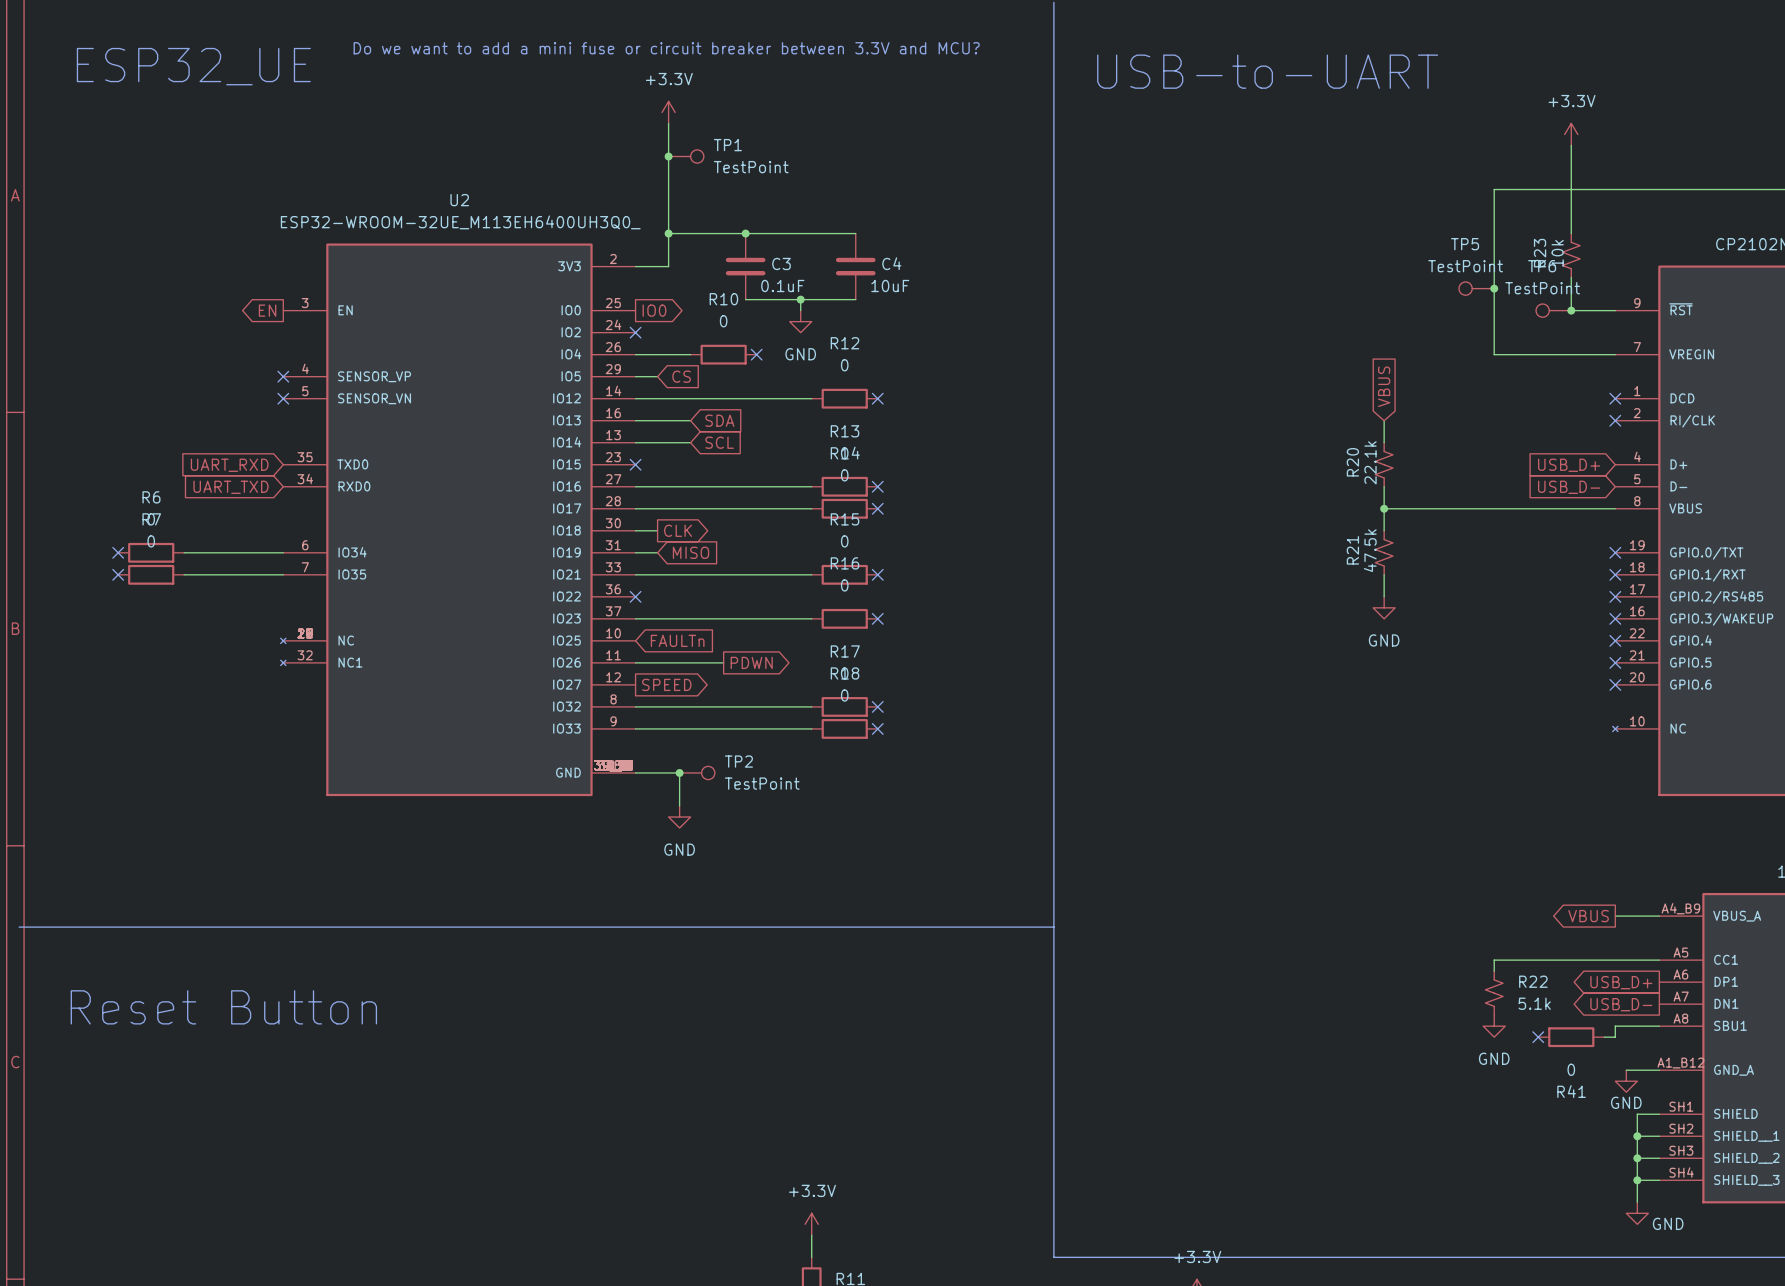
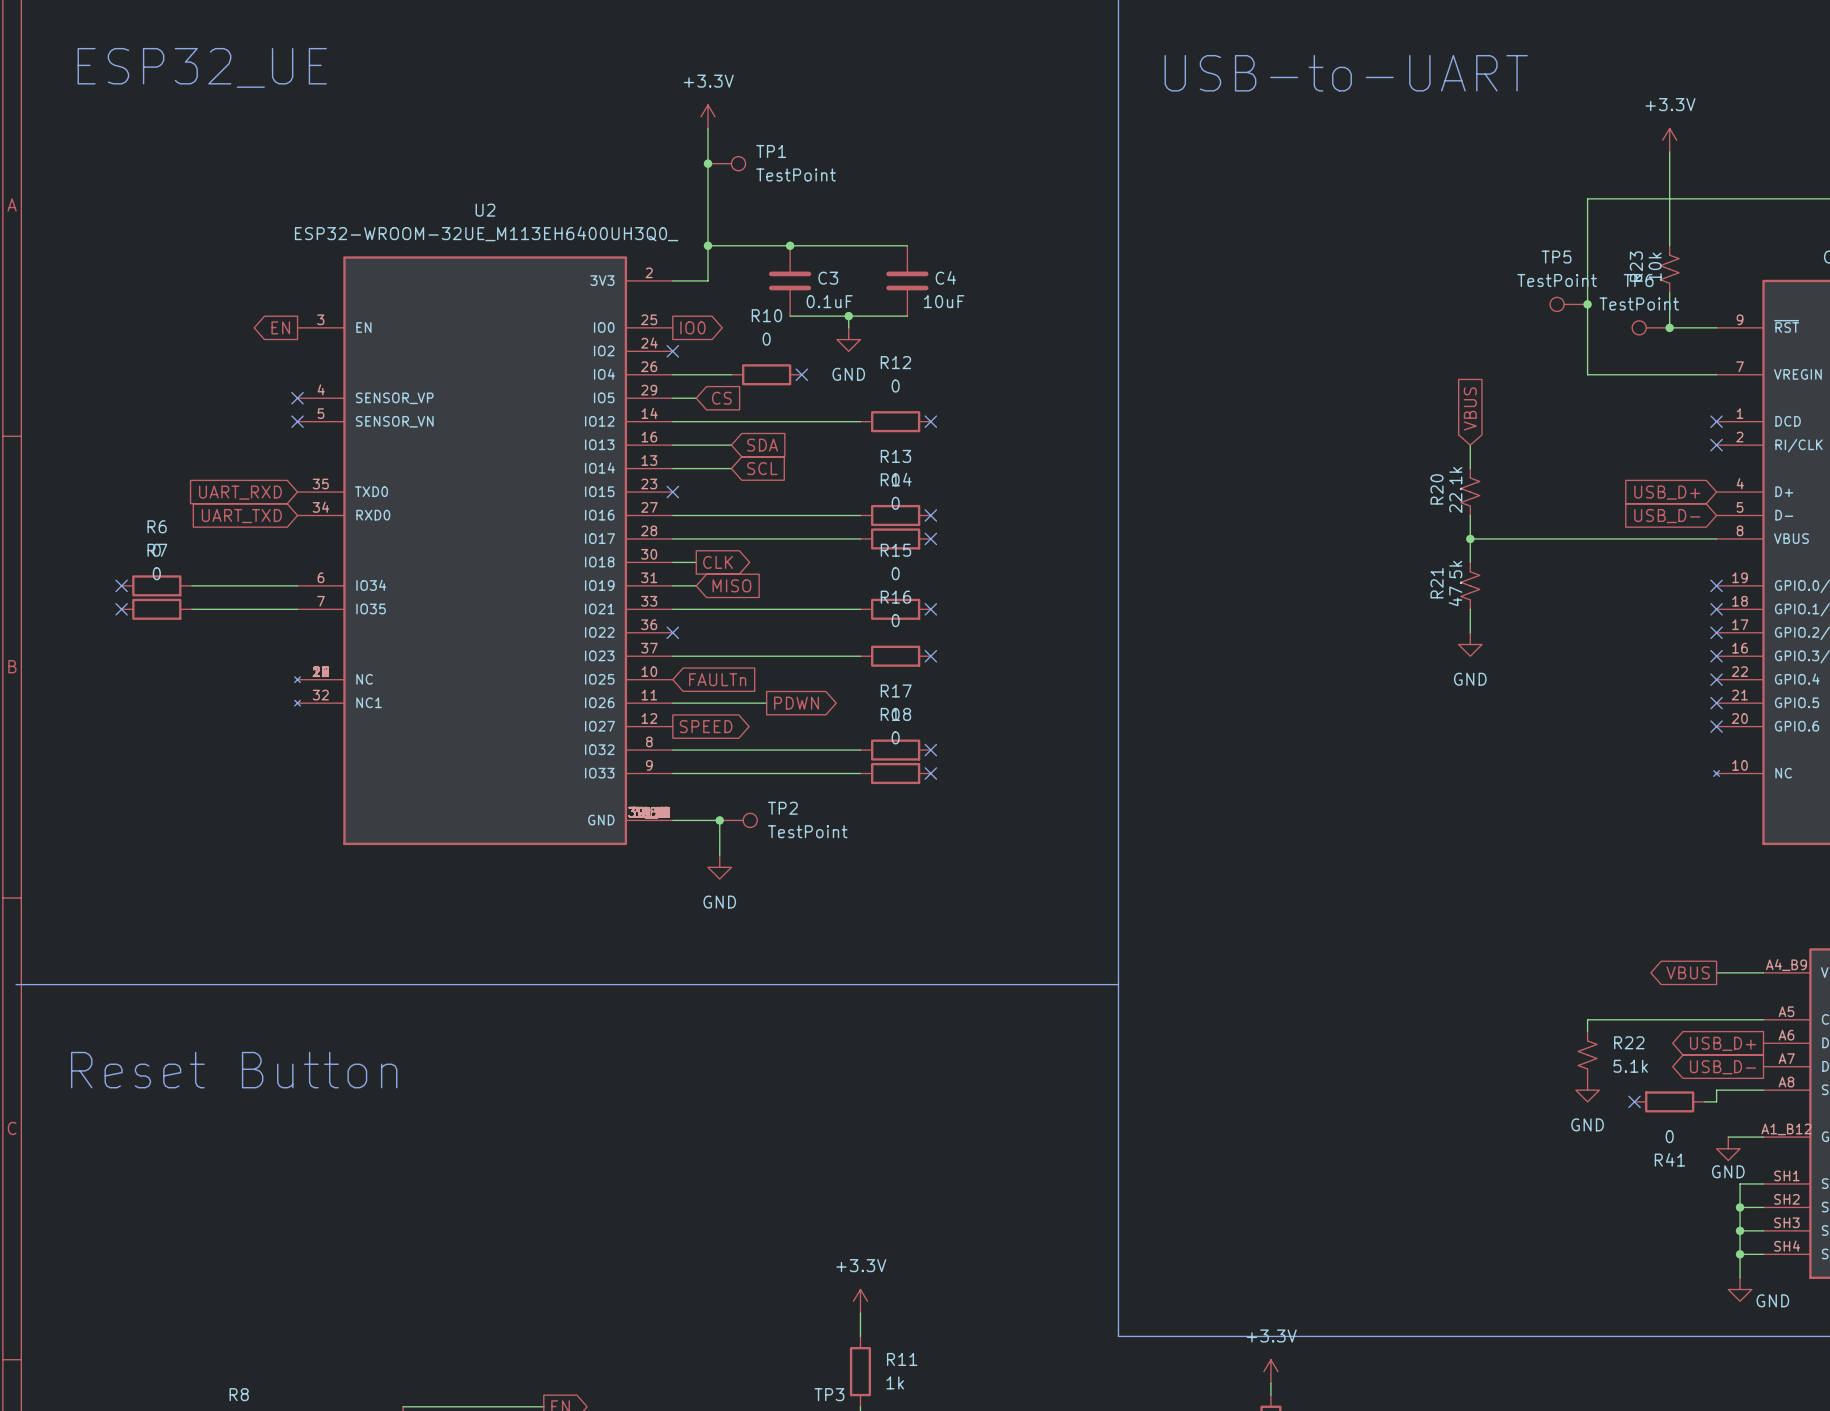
text: Do we want to add a mini fuse or circuit breaker between 3.3V and MCU? (666, 48) -> none

